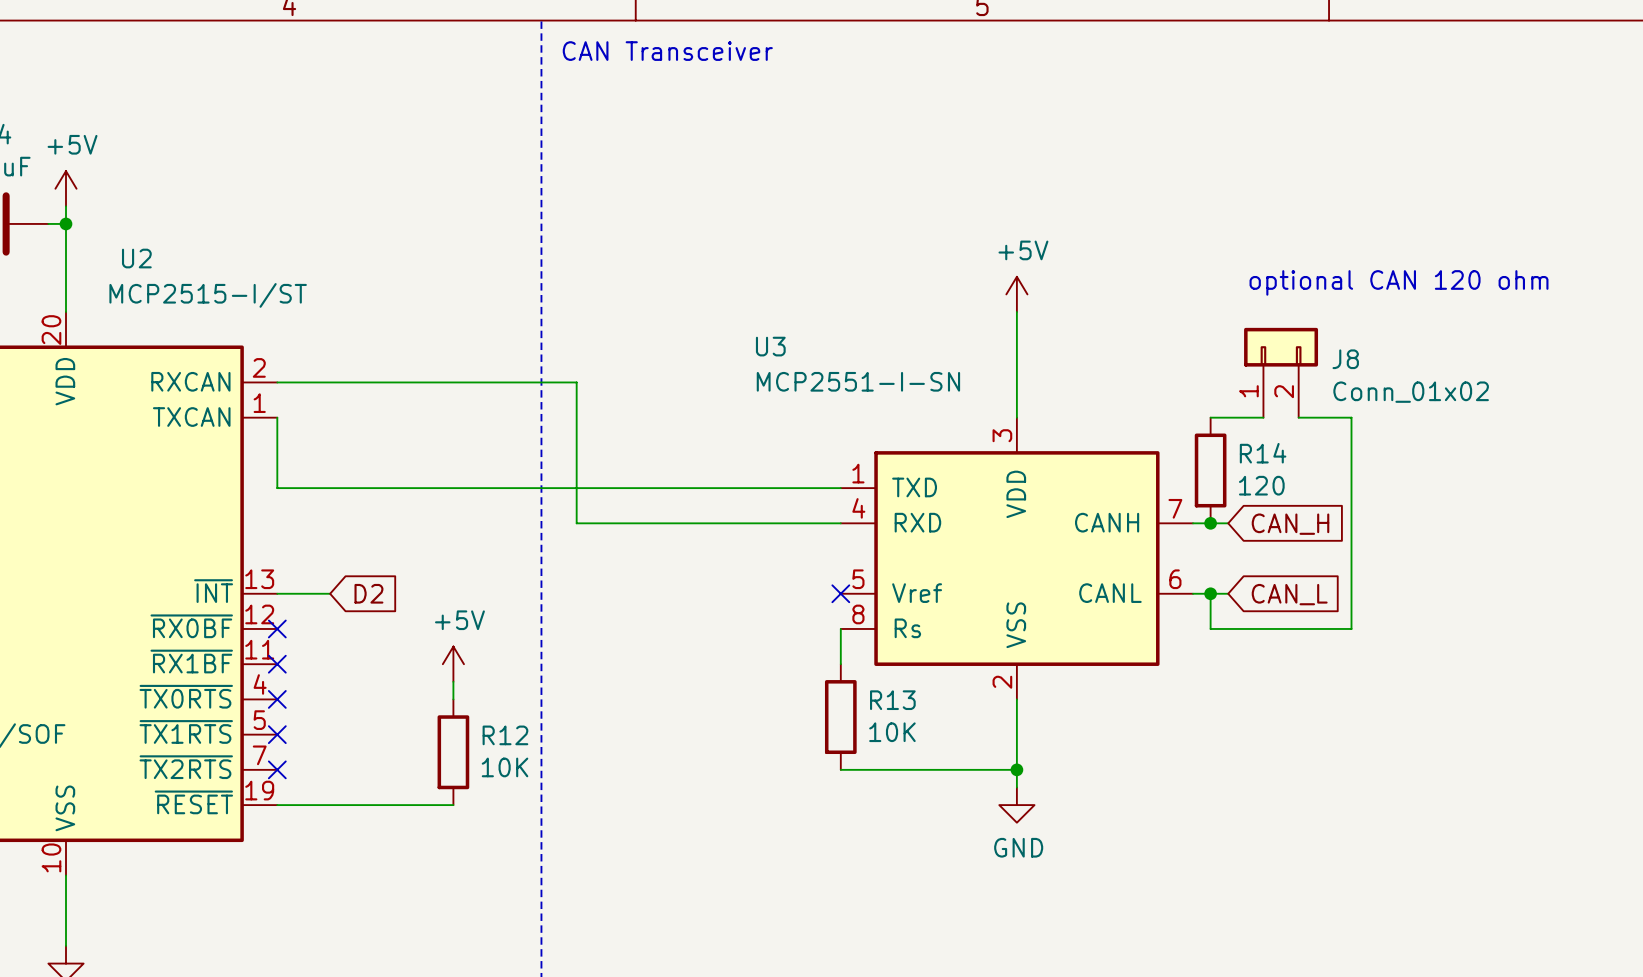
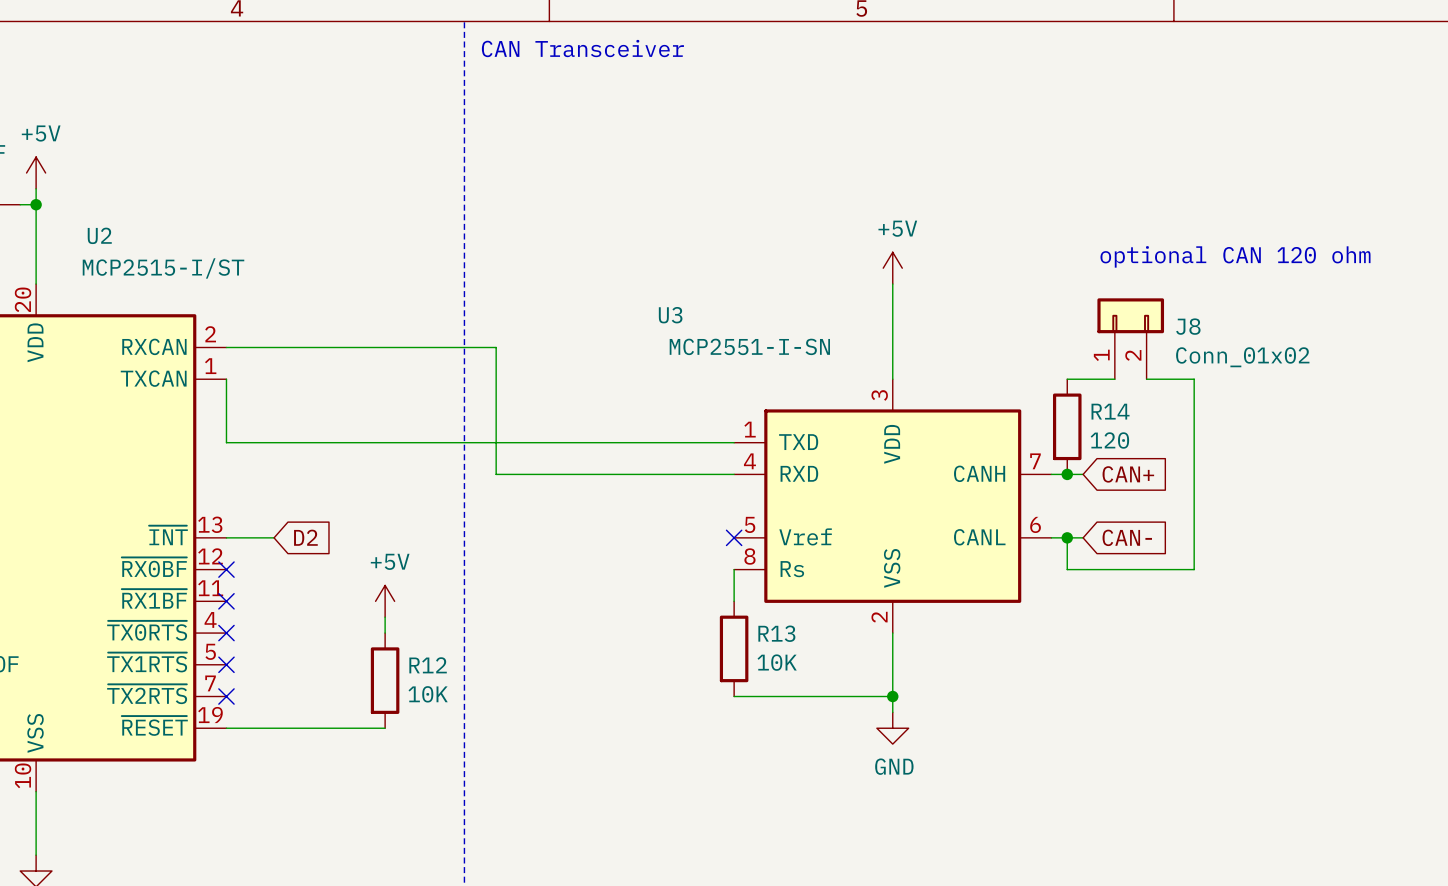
global label: CAN_H (1290, 524) -> CAN+ (1128, 474)
global label: CAN_L (1289, 594) -> CAN- (1127, 537)

